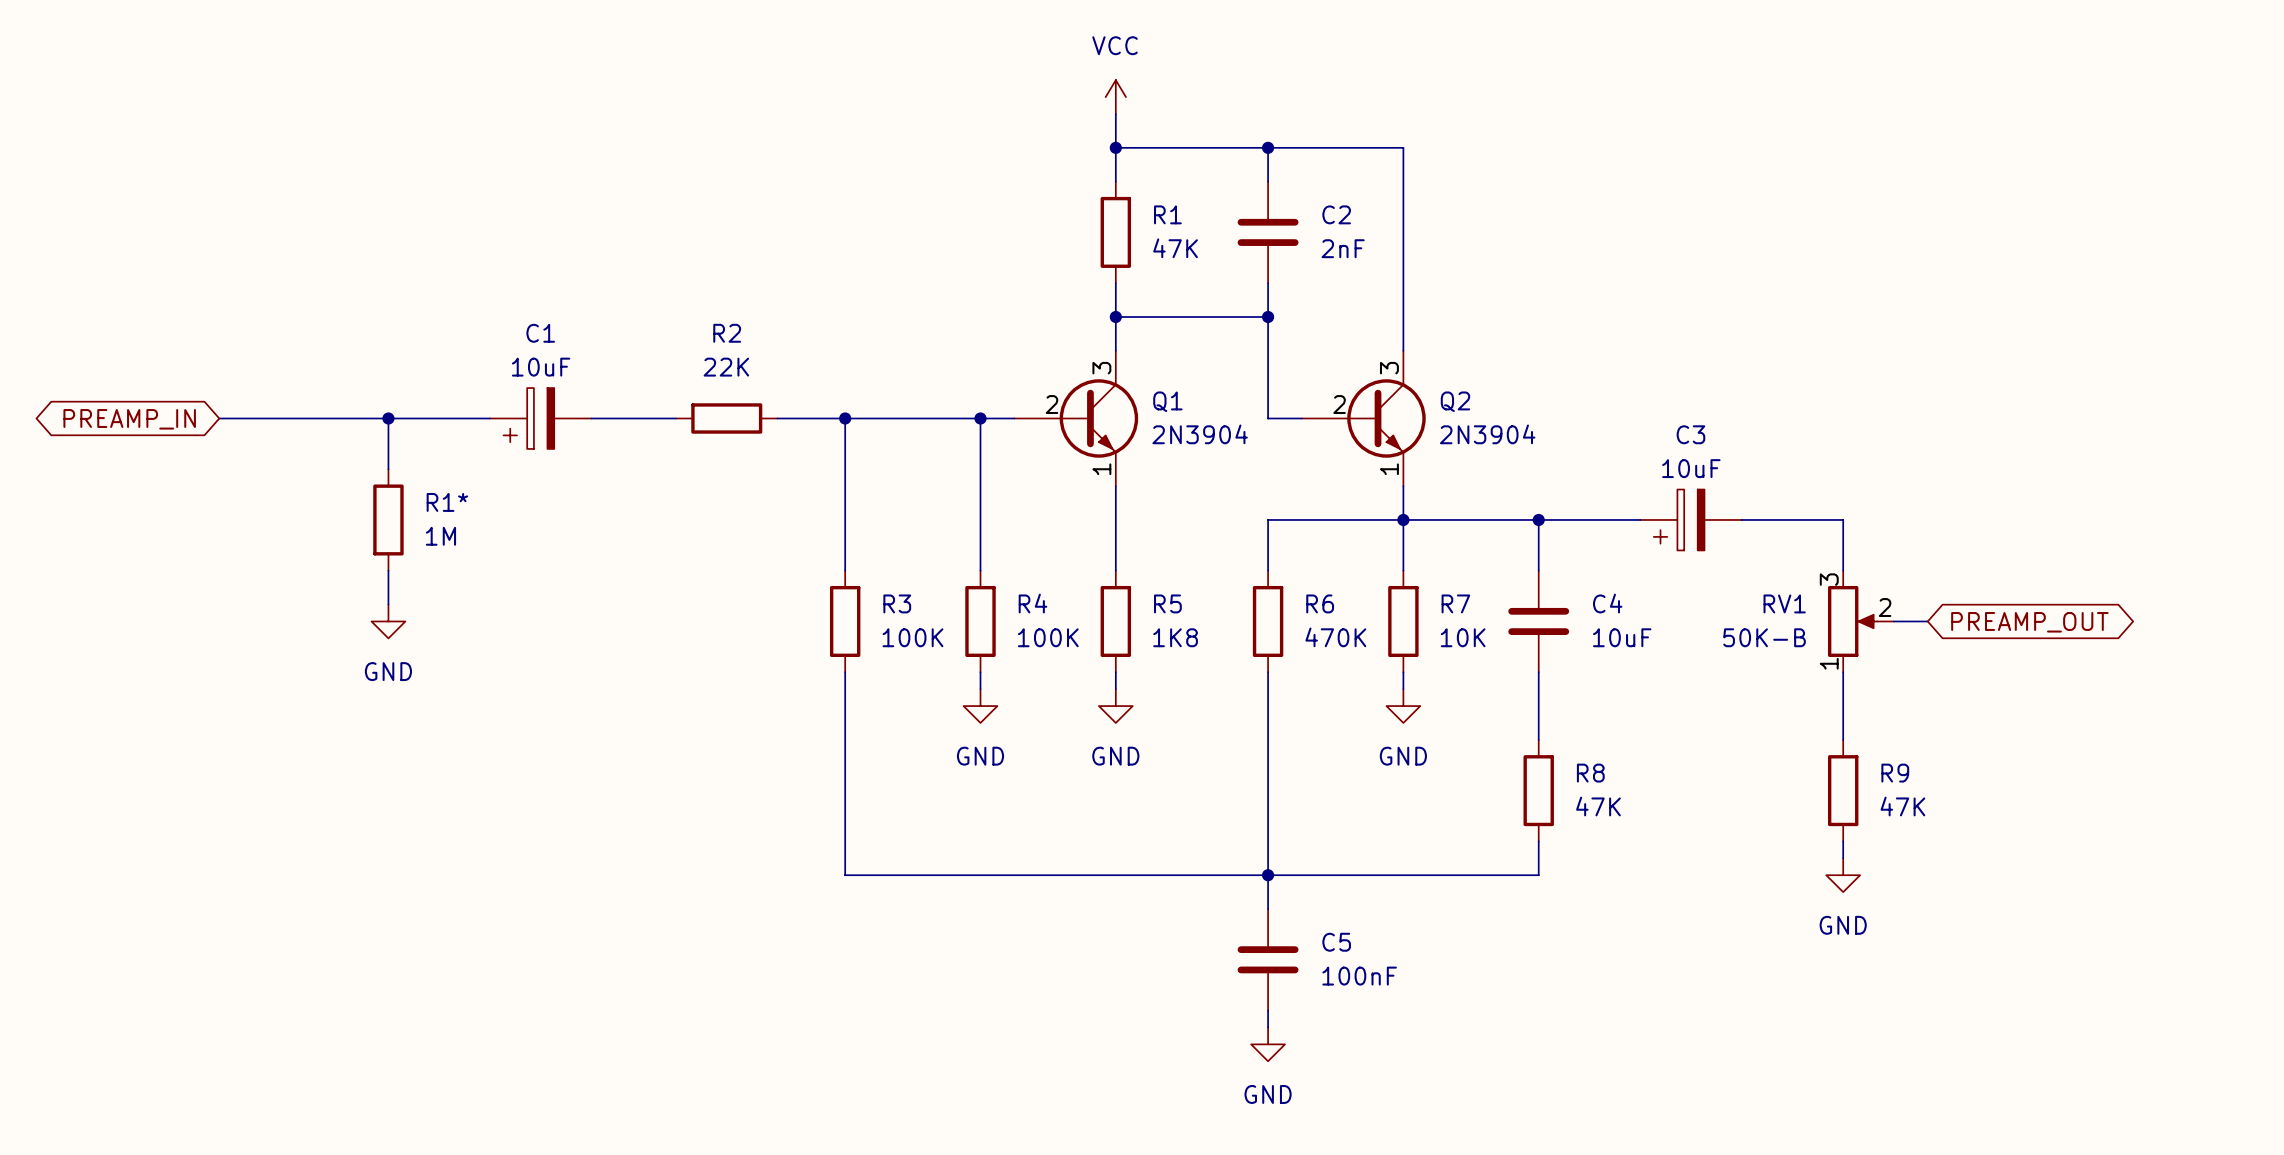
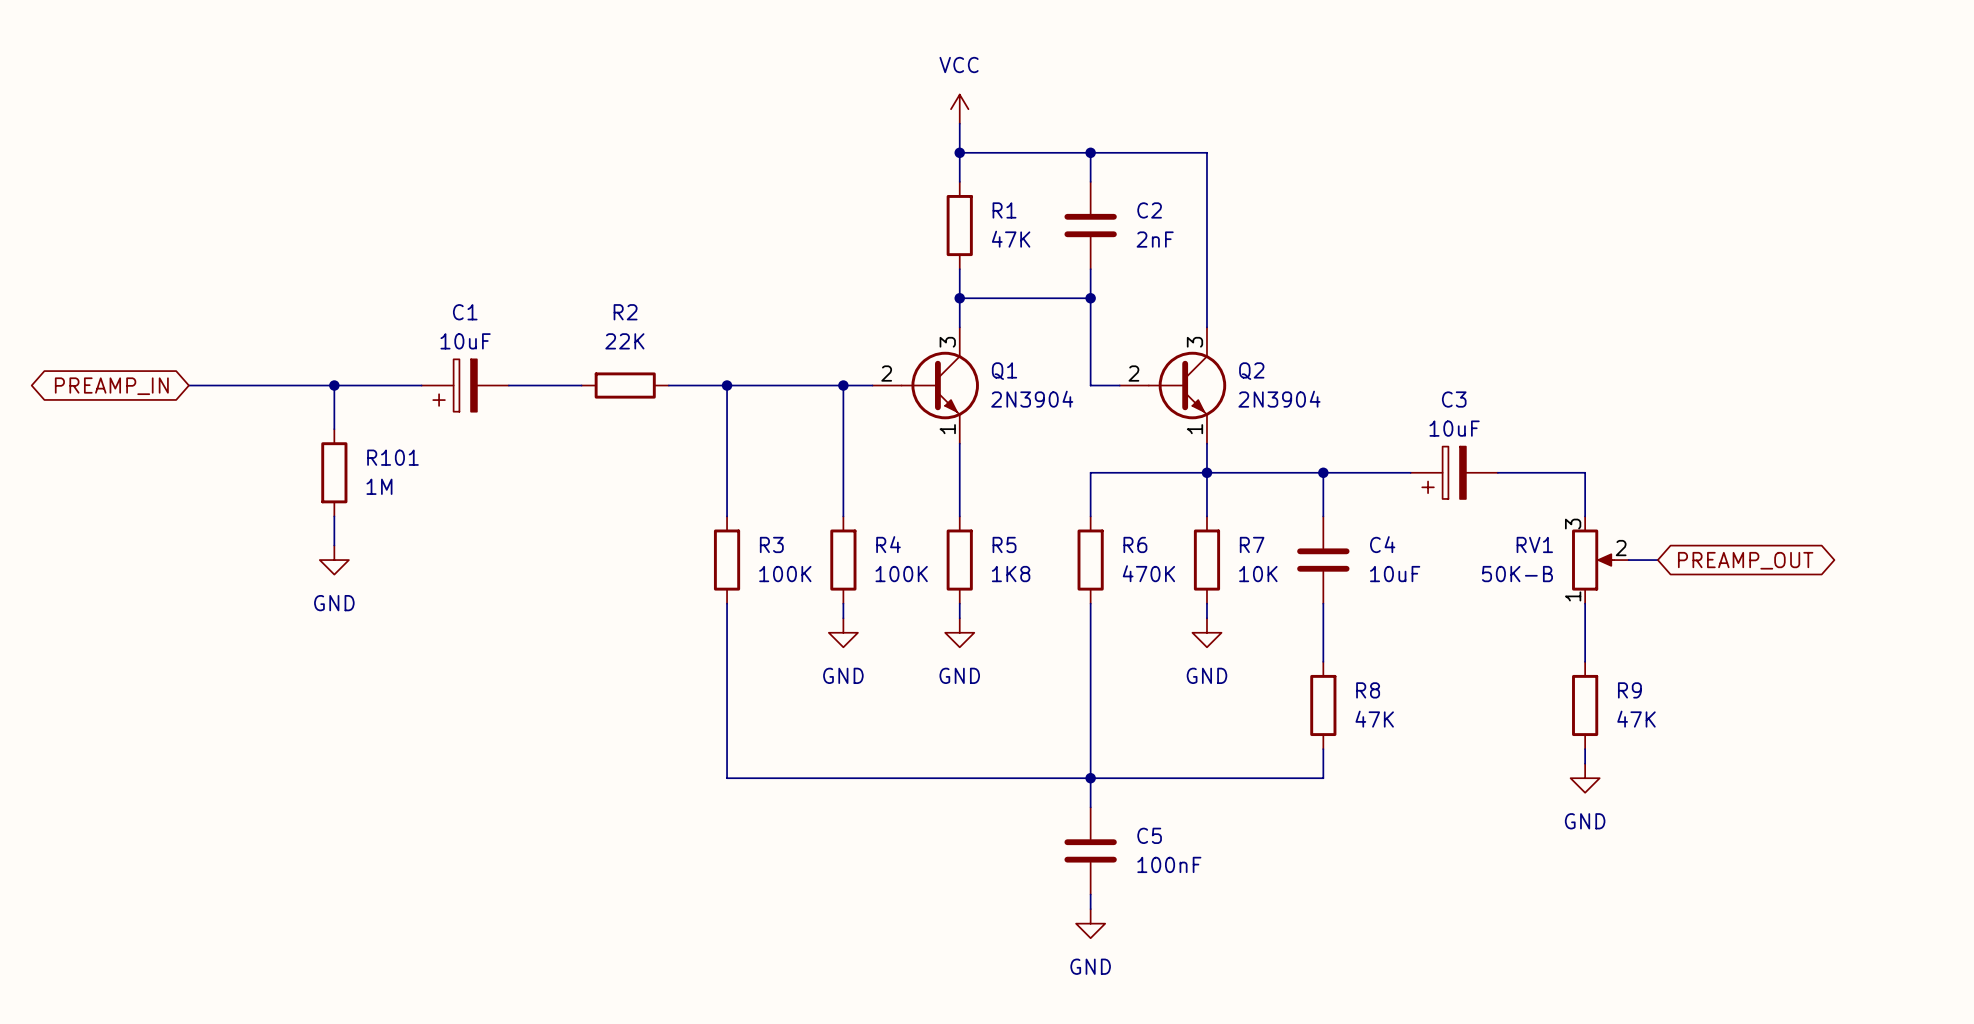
Q1 symbol: [1014, 350, 1139, 487] -> [872, 327, 979, 444]
Q2 symbol: [1301, 350, 1426, 487] -> [1119, 327, 1227, 444]
R1* name: R1* (447, 502) -> R101 (392, 457)

